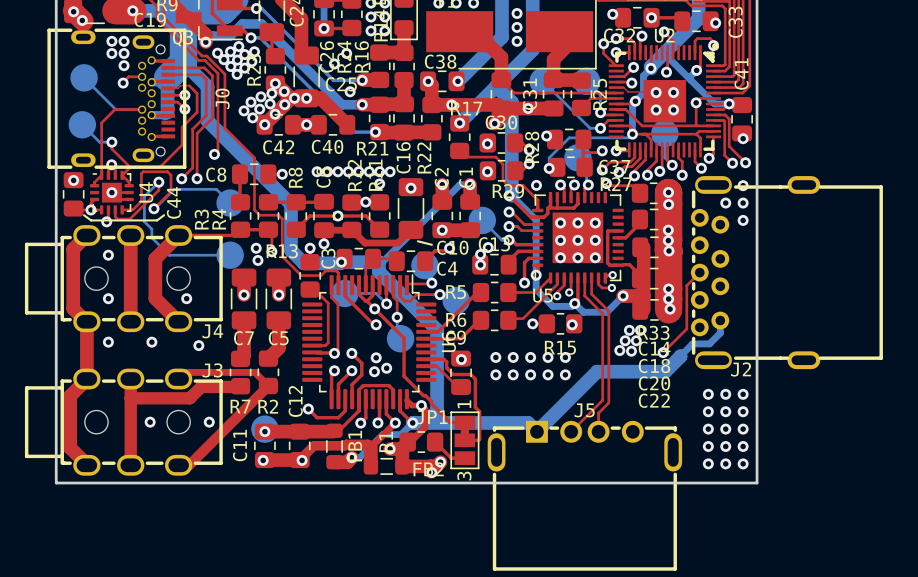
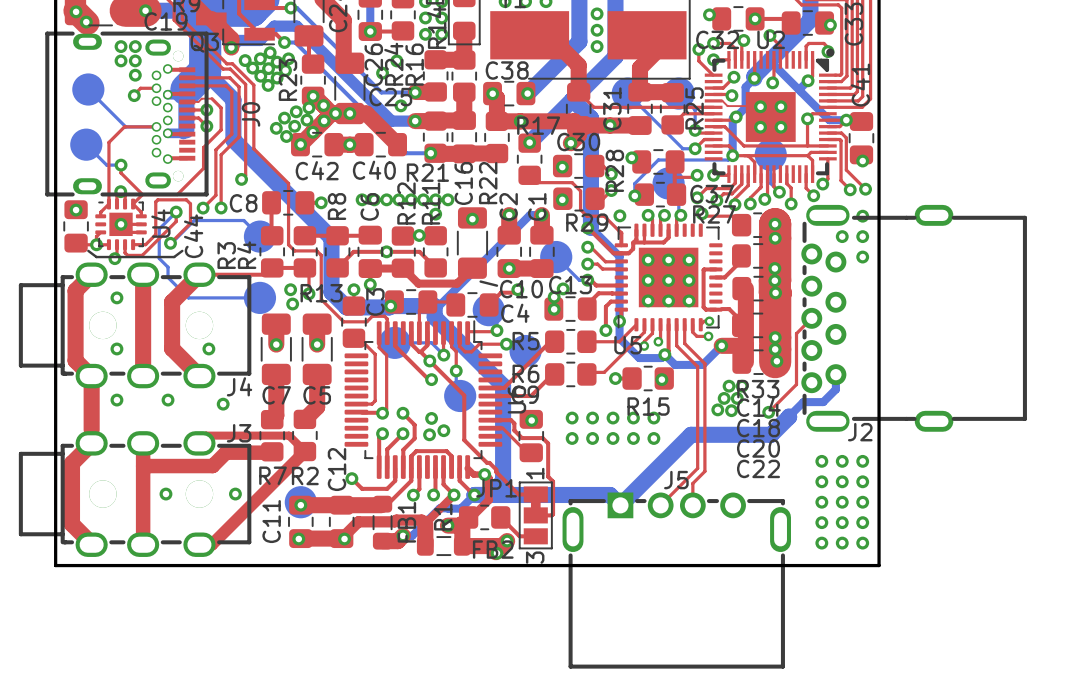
J0 footprint: [47, 28, 187, 169] -> [45, 31, 209, 197]
J4 footprint: [24, 225, 223, 333] -> [18, 262, 252, 389]
J3 footprint: [24, 368, 223, 476] -> [18, 431, 252, 557]

